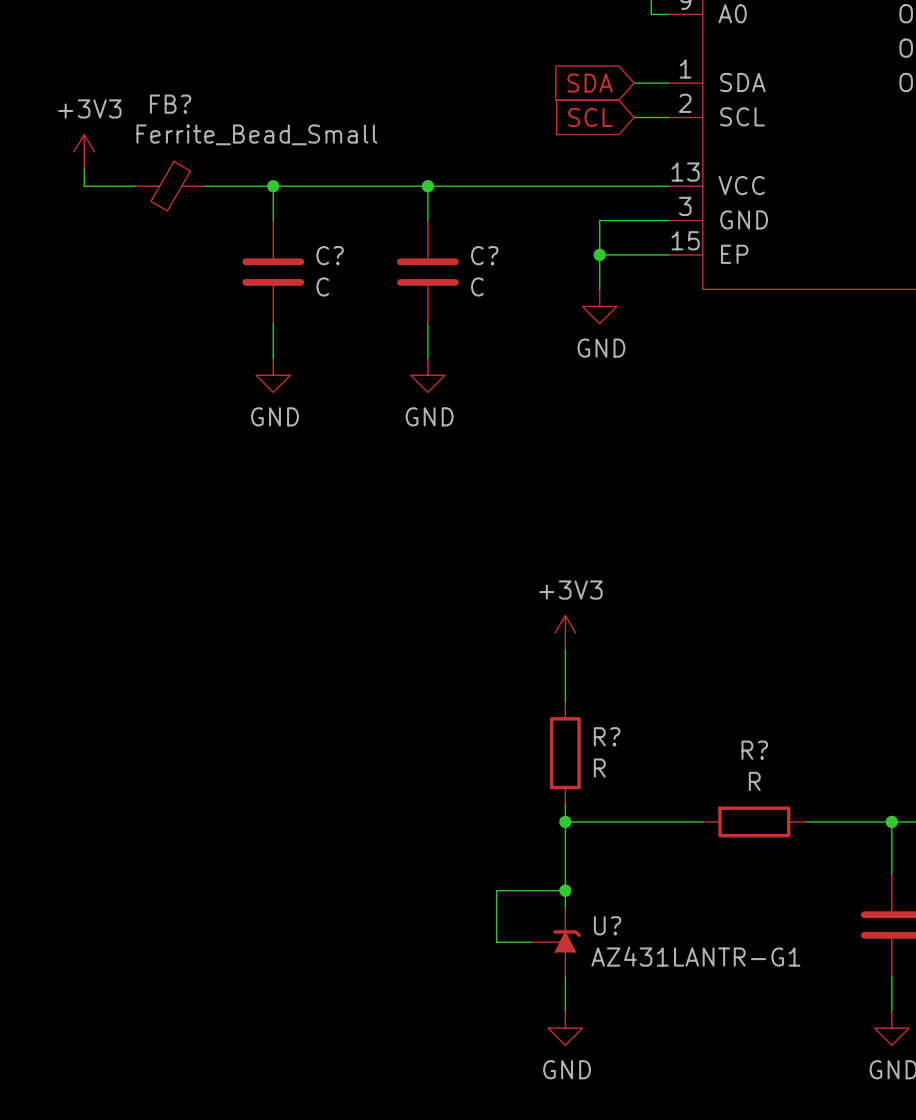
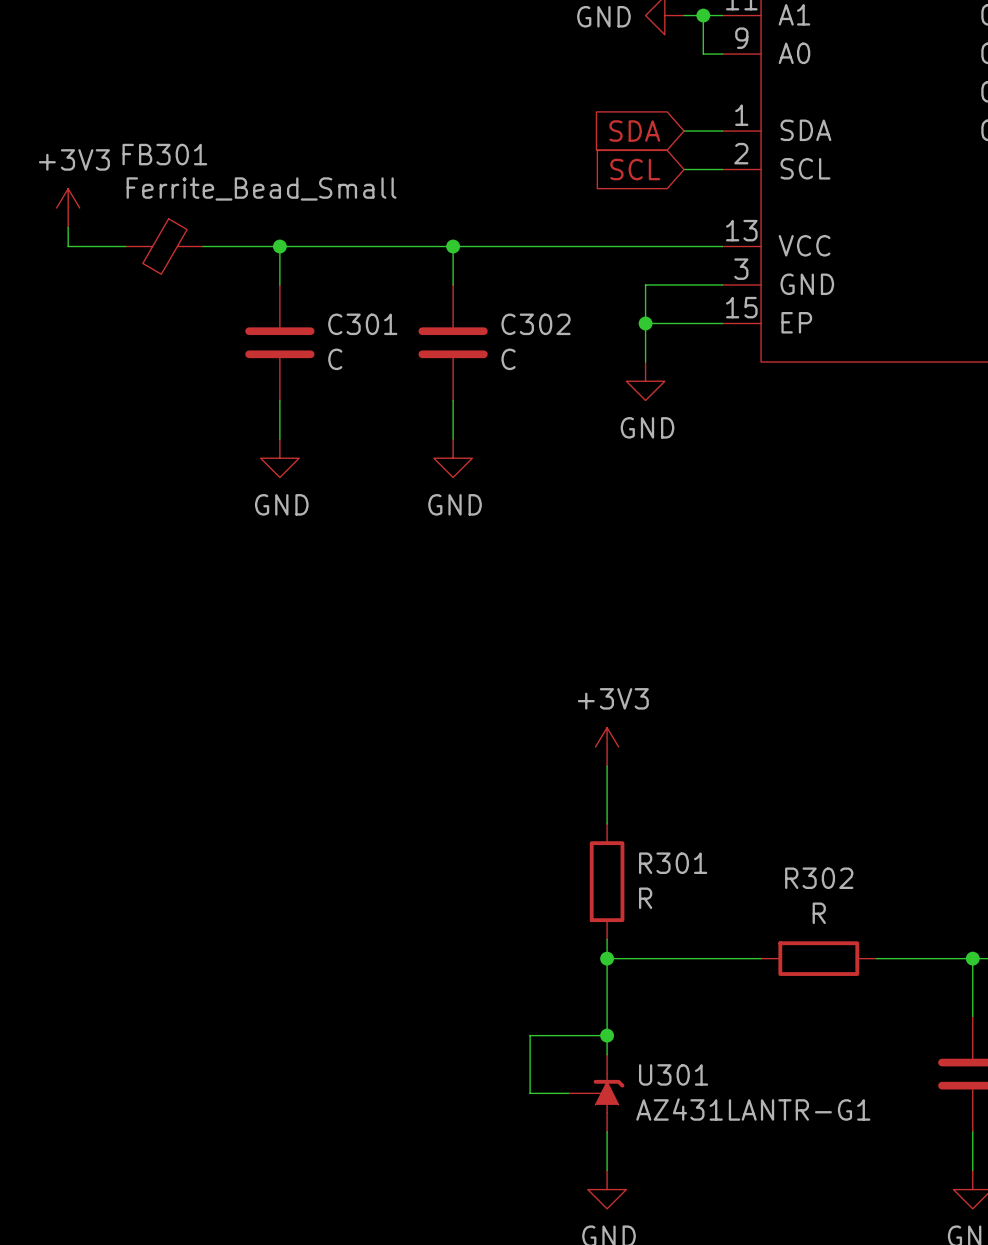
FB? name: FB? (170, 104) -> FB301 (164, 154)
C? name: C? (330, 255) -> C301 (362, 324)
C? name: C? (484, 255) -> C302 (536, 324)
R? name: R? (607, 736) -> R301 (673, 863)
R? name: R? (754, 750) -> R302 (819, 878)
U? name: U? (607, 925) -> U301 (673, 1074)

